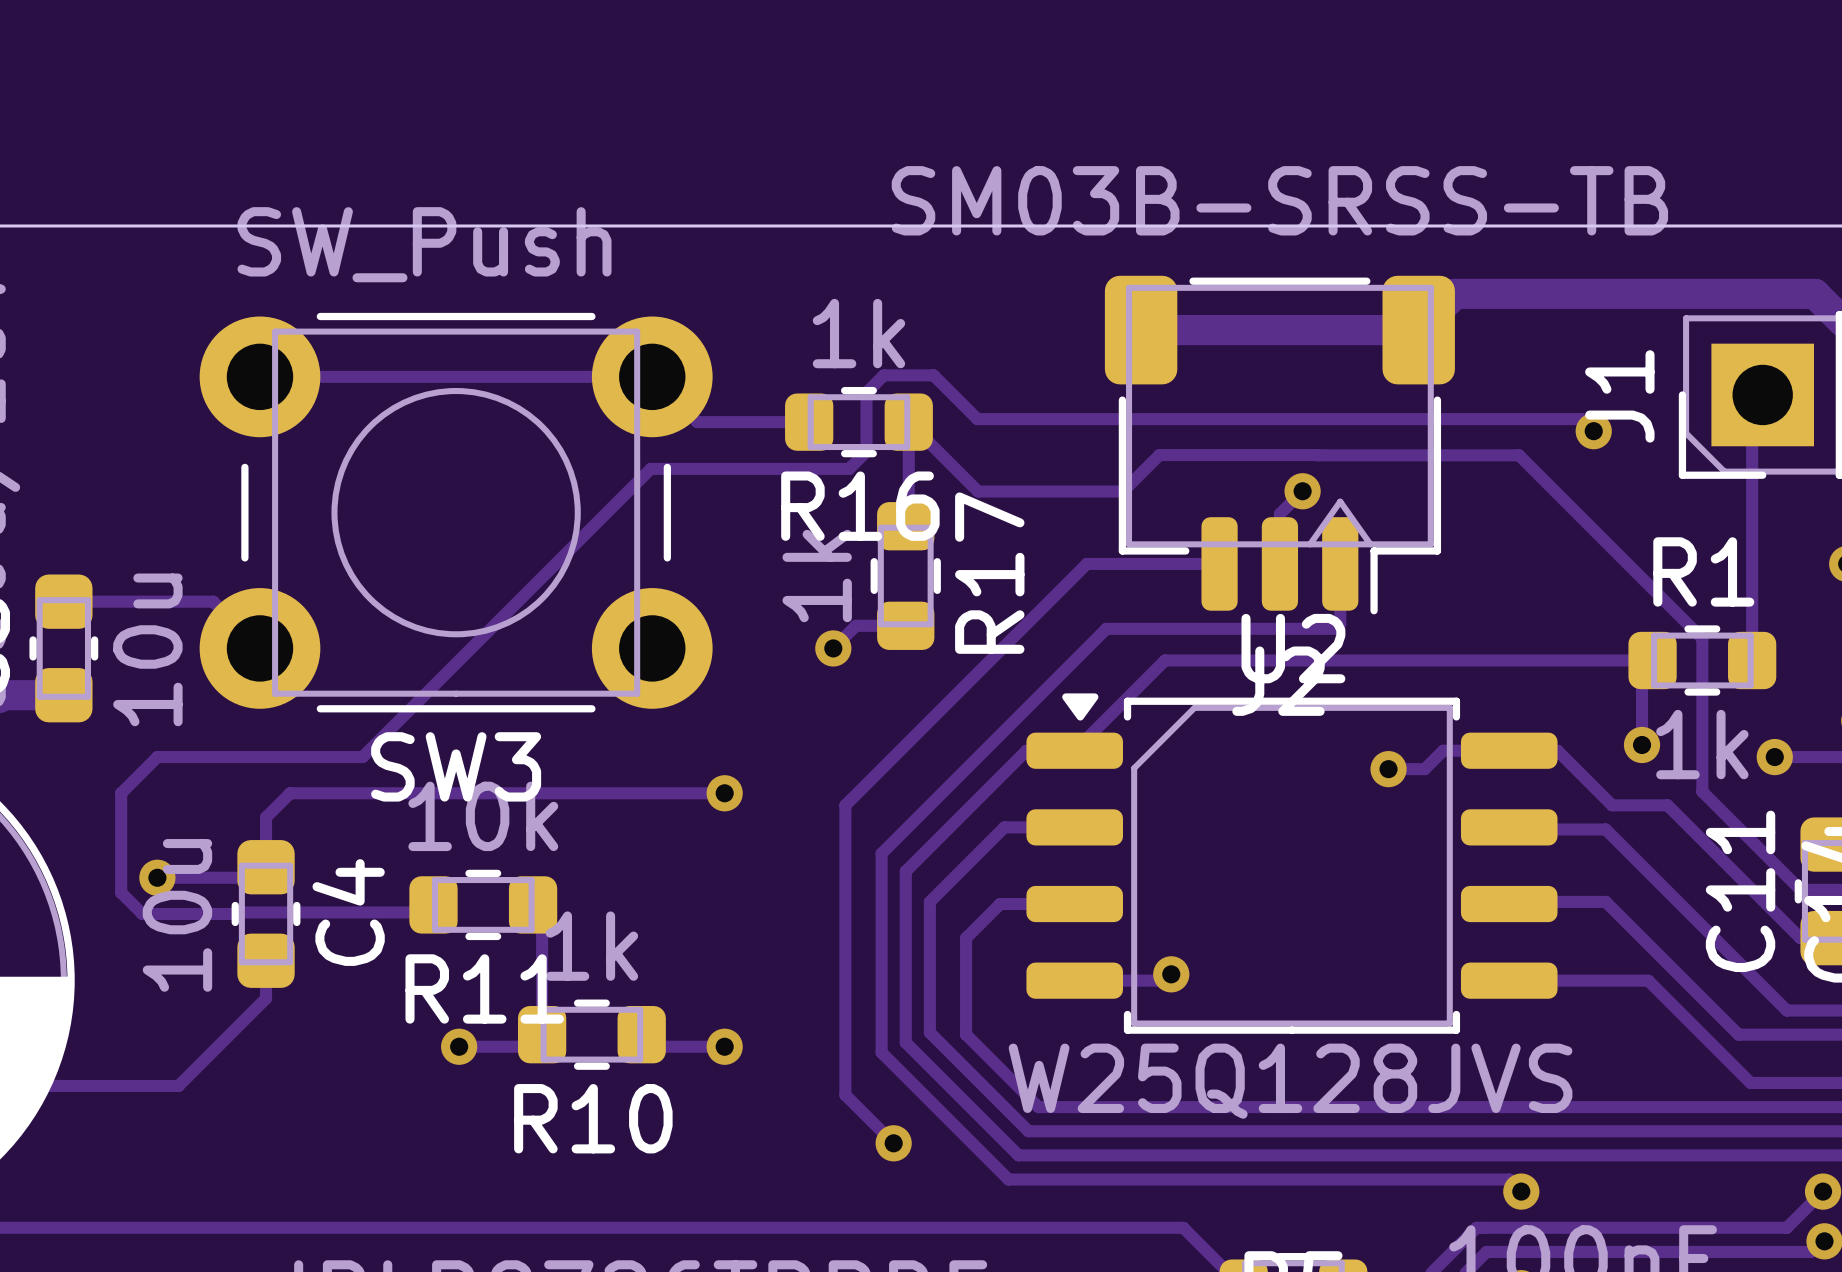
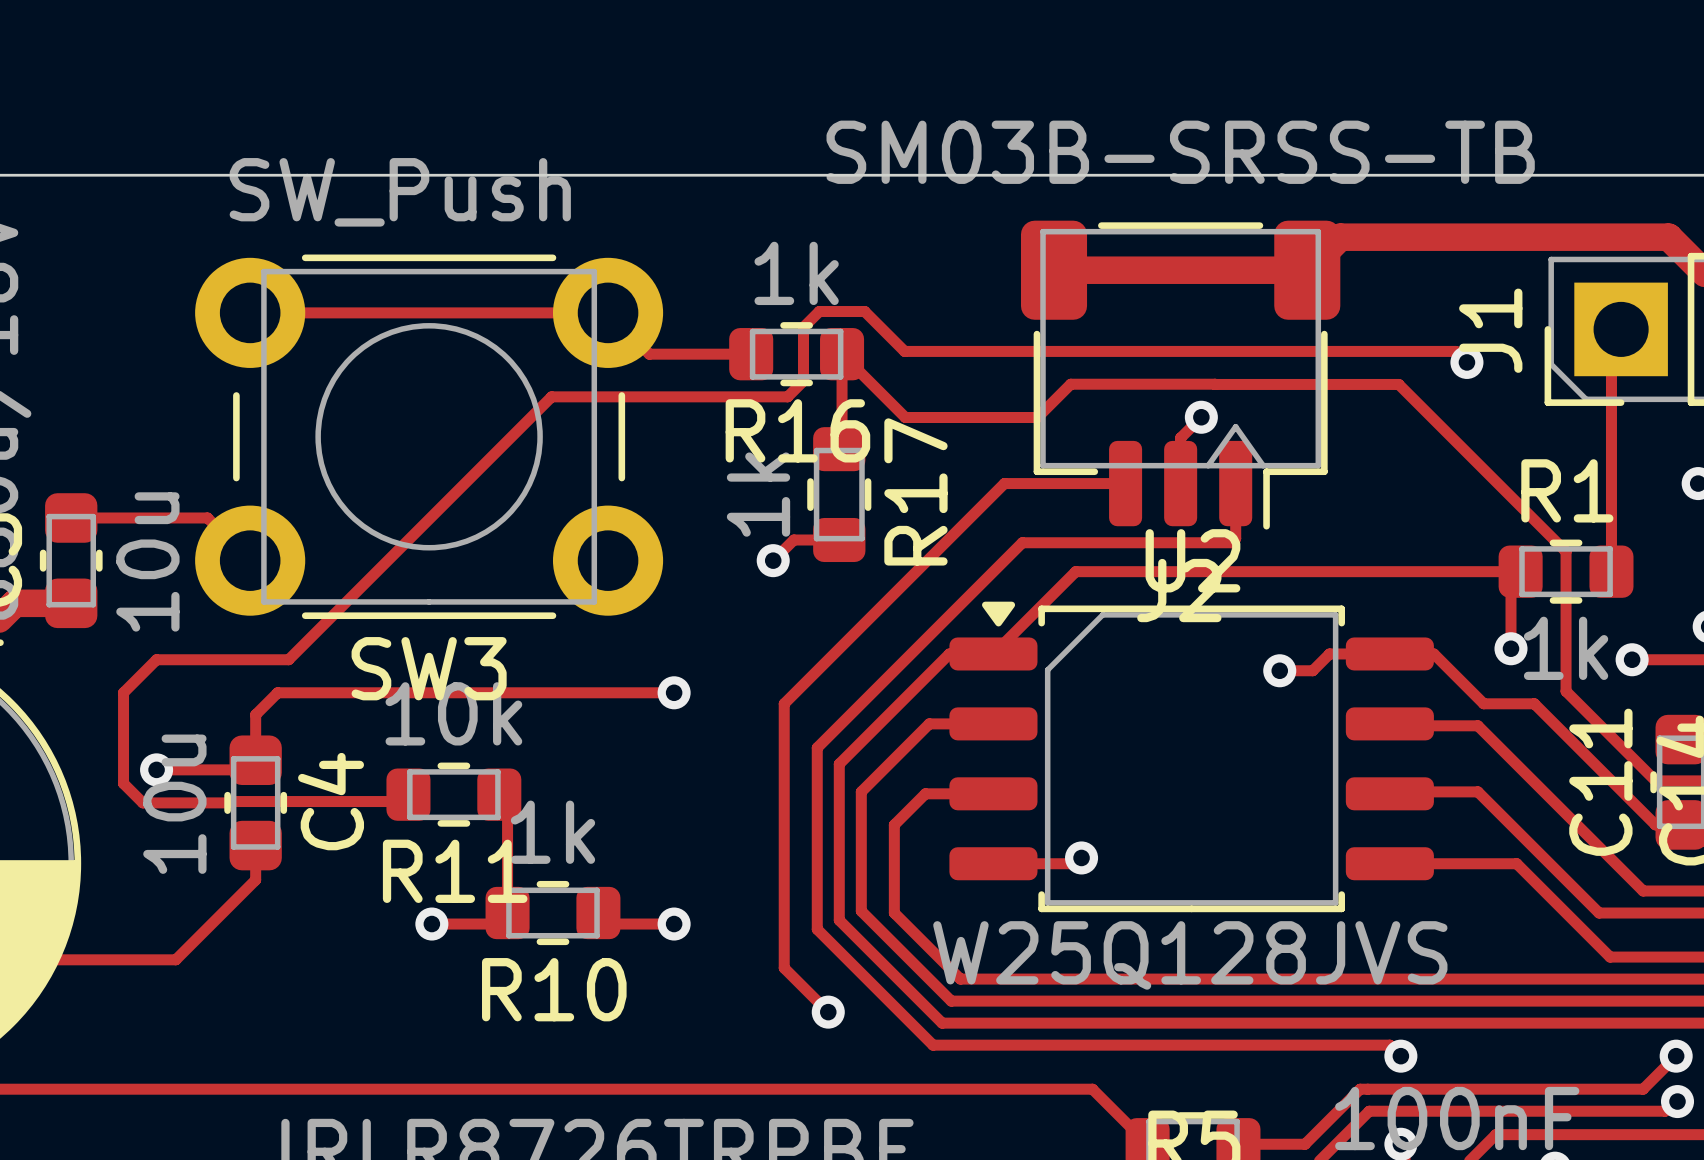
track: (650, 468) (362, 757) (302, 757) -> (606, 396) (551, 396) (288, 659)

